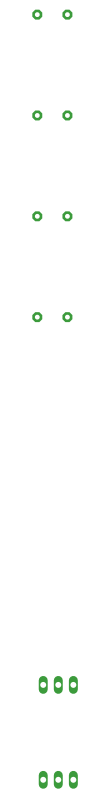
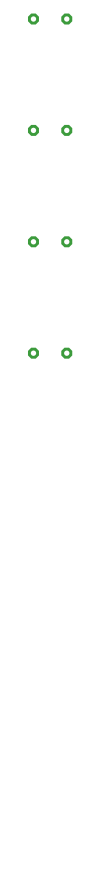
part: (58, 684) -> none
part: (58, 779) -> none

